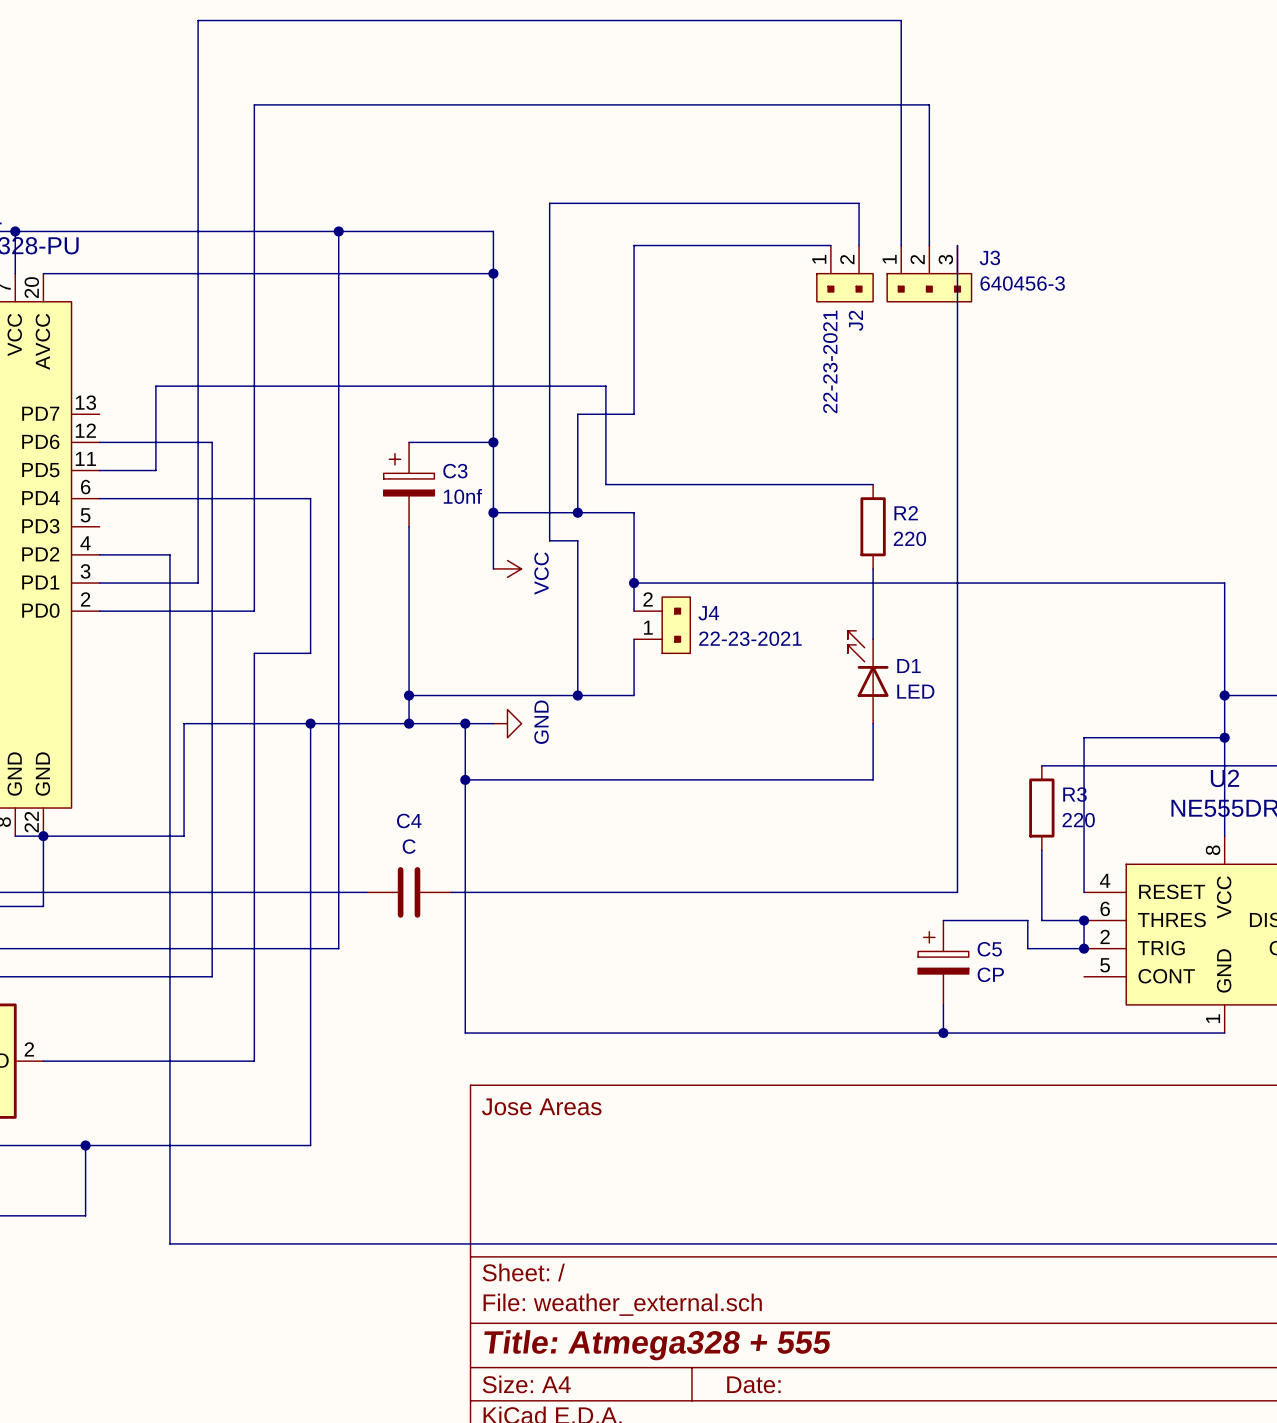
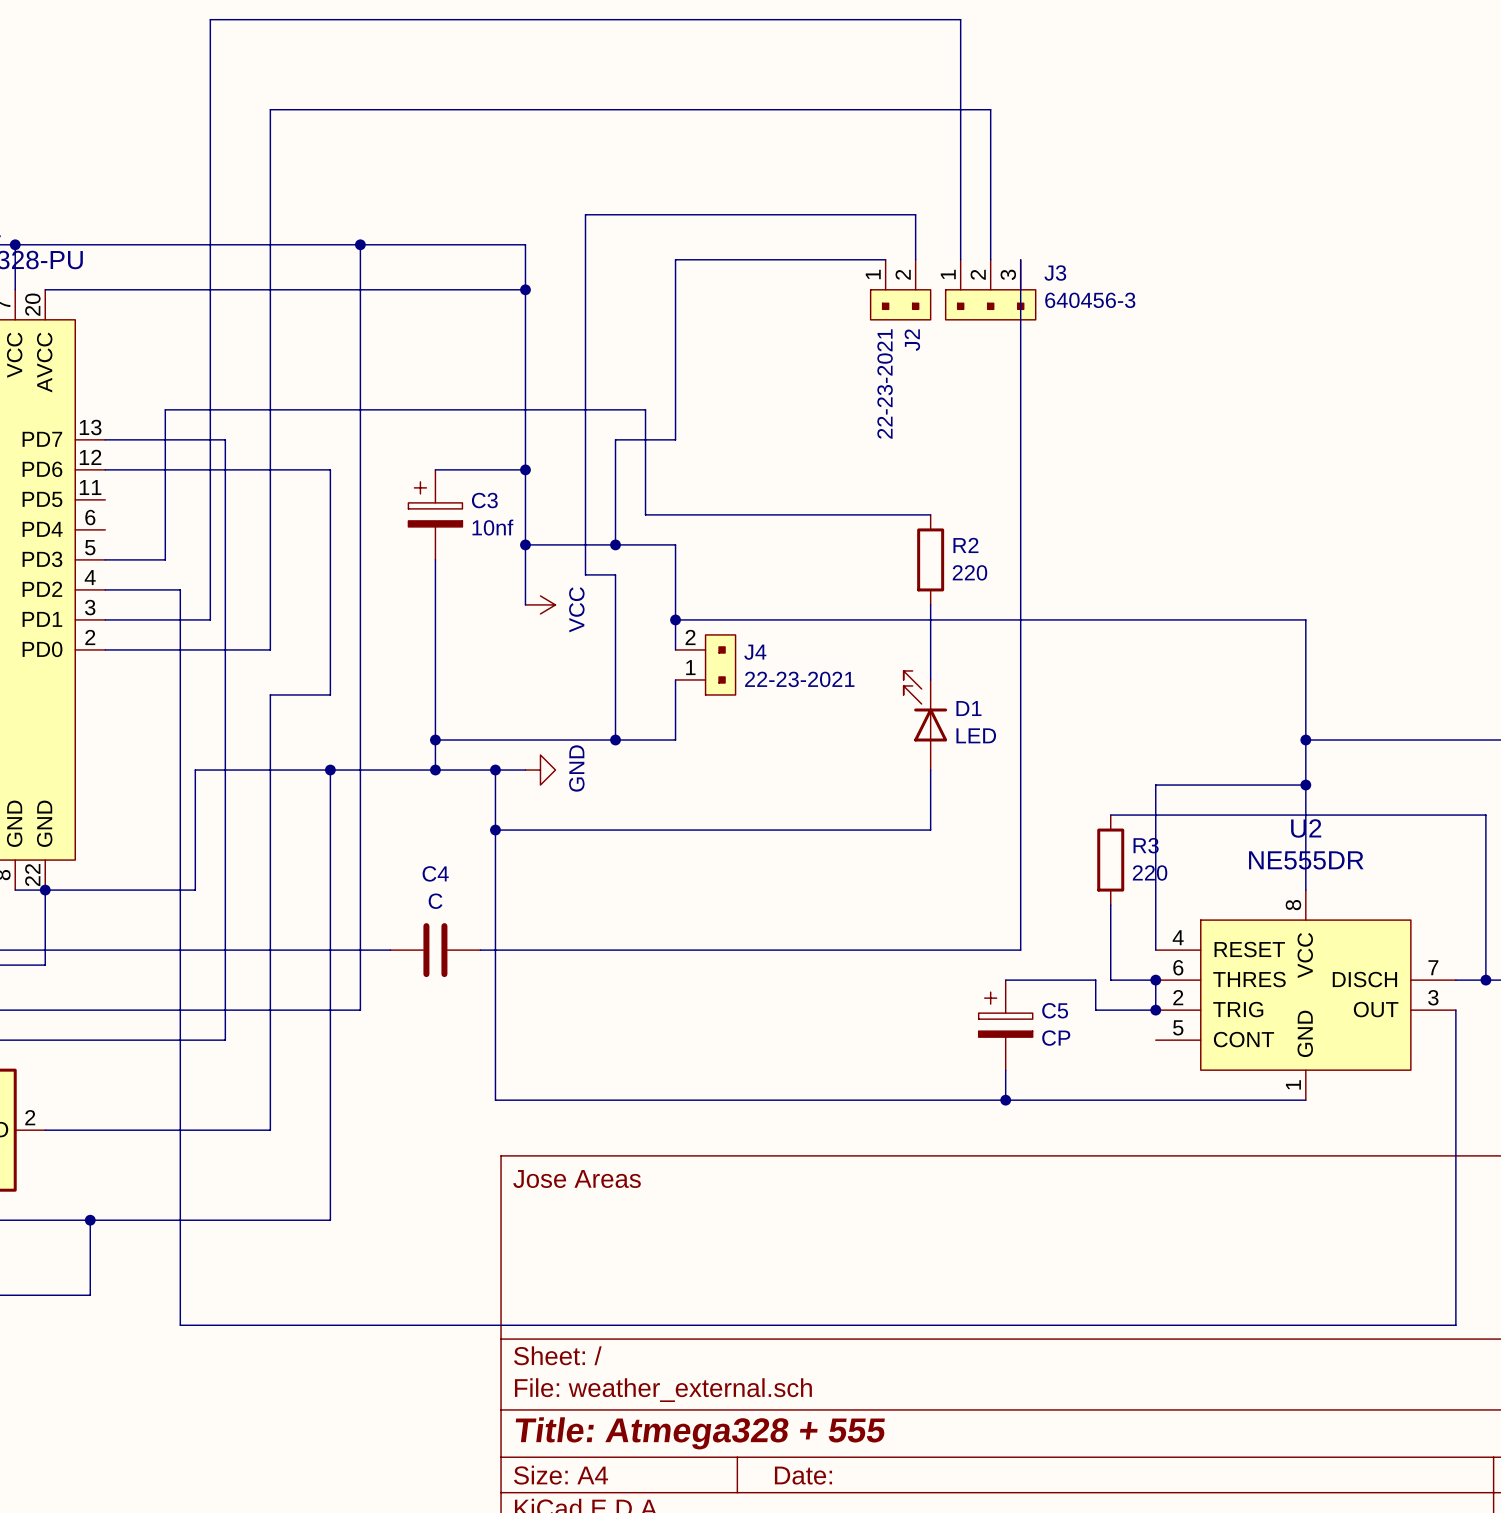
wire: (99, 470) (155, 470) -> (105, 559) (165, 559) (165, 499)
wire: (99, 498) (310, 498) -> (105, 439) (225, 439) (225, 469) (330, 469) (330, 529)

